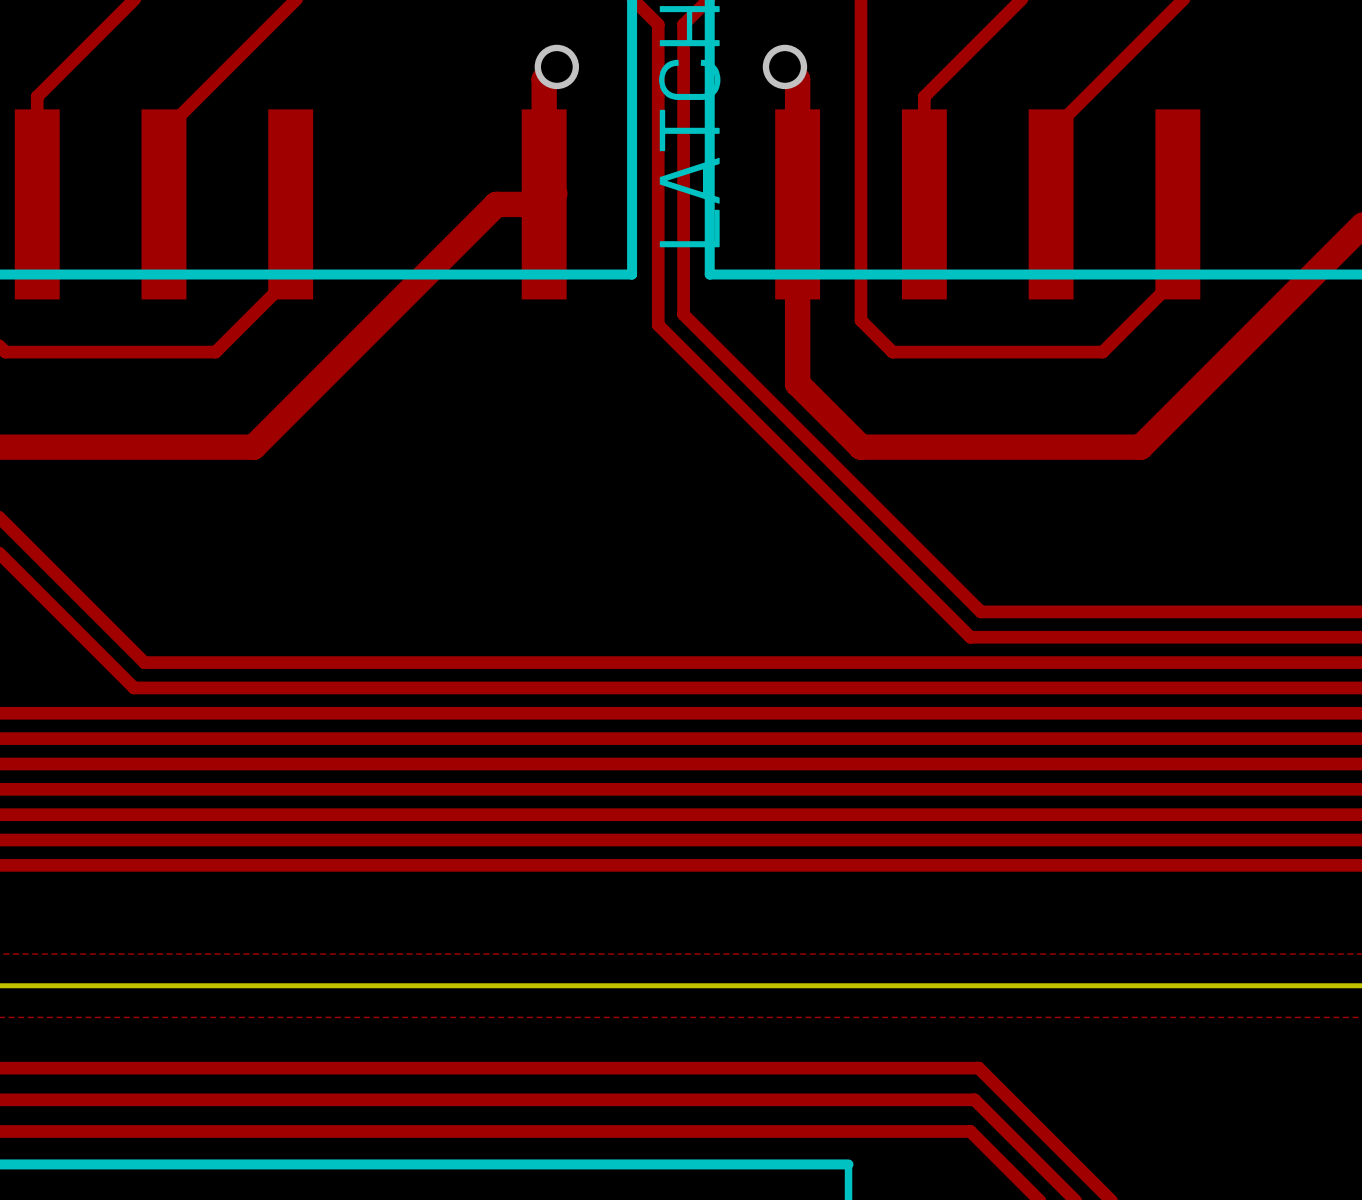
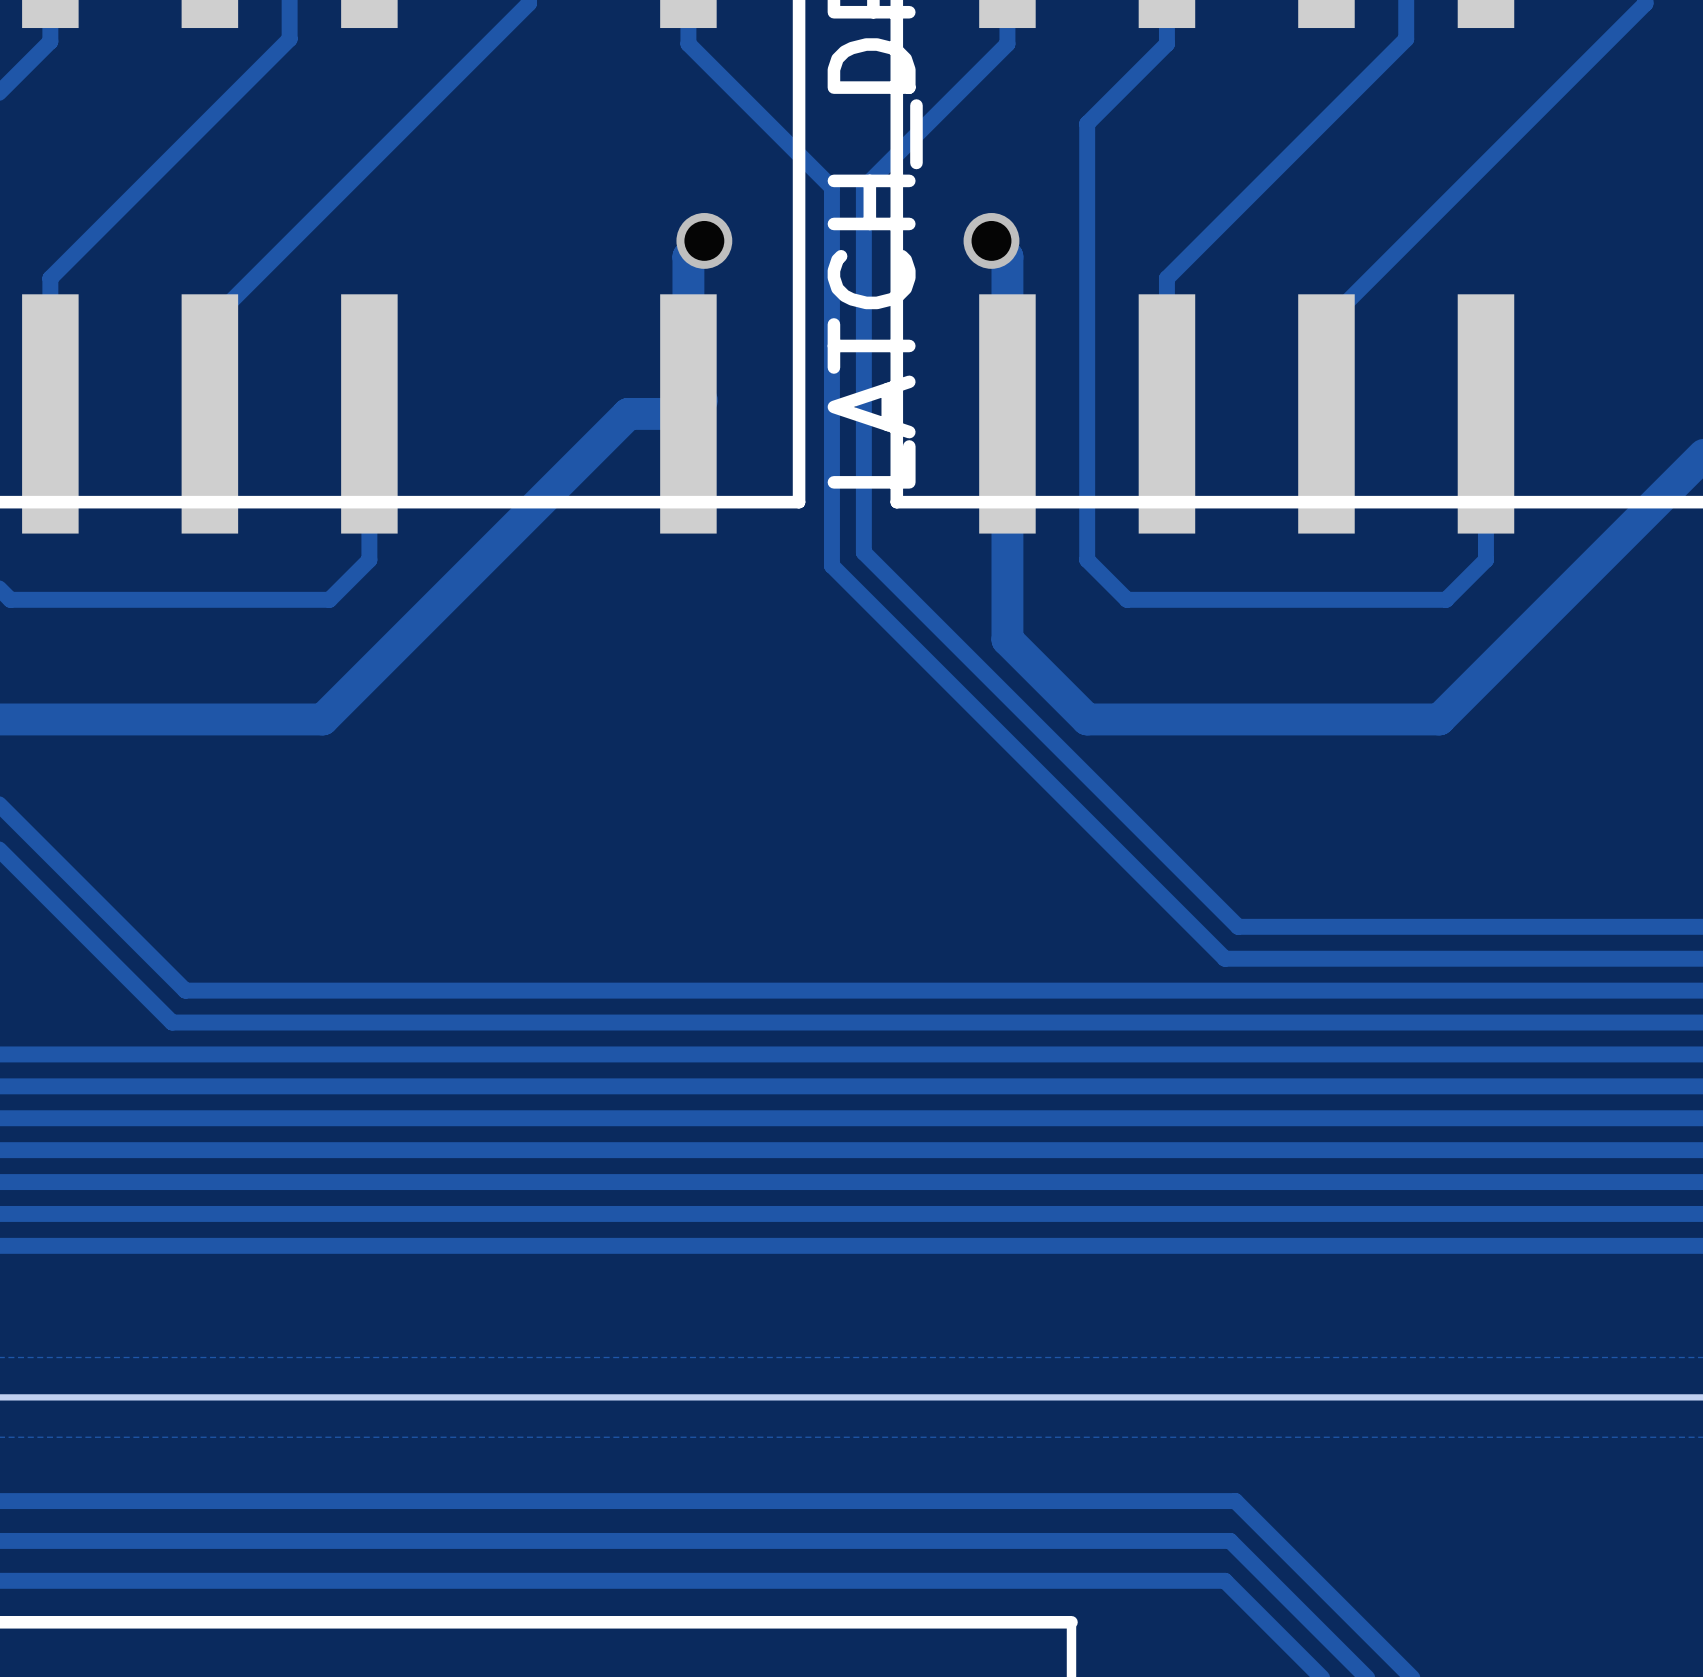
track: (290, 277) (215, 352) -> (369, 505) (369, 559) (329, 599) (274, 599)
track: (1177, 277) (1102, 352) -> (1485, 505) (1485, 559) (1446, 599) (1391, 599)

